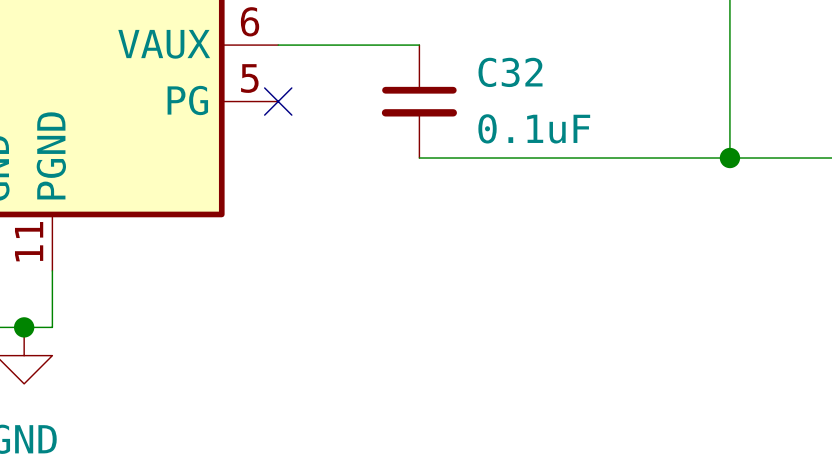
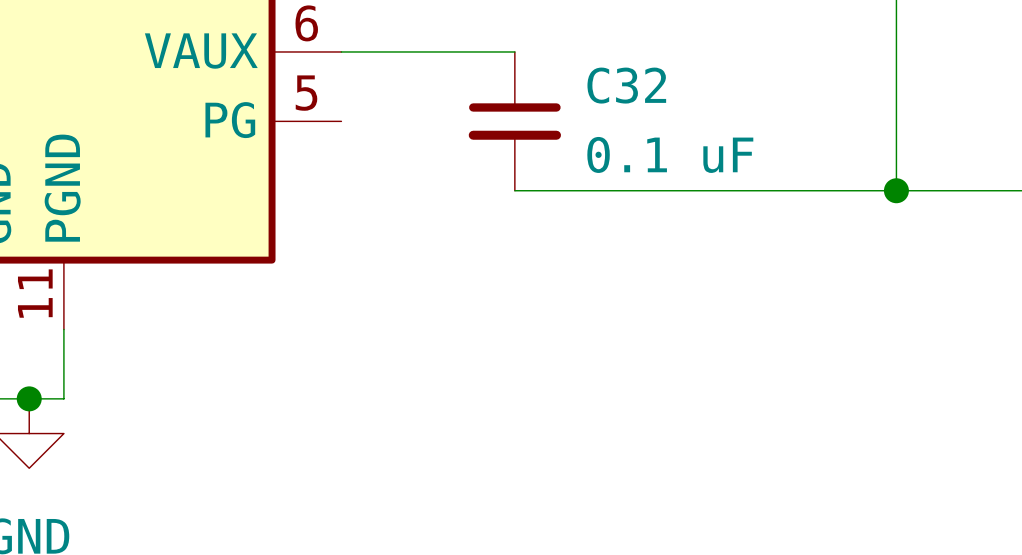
no-connect mark: (278, 101) -> none
C32 value: 0.1uF (534, 128) -> 0.1 uF (670, 154)

